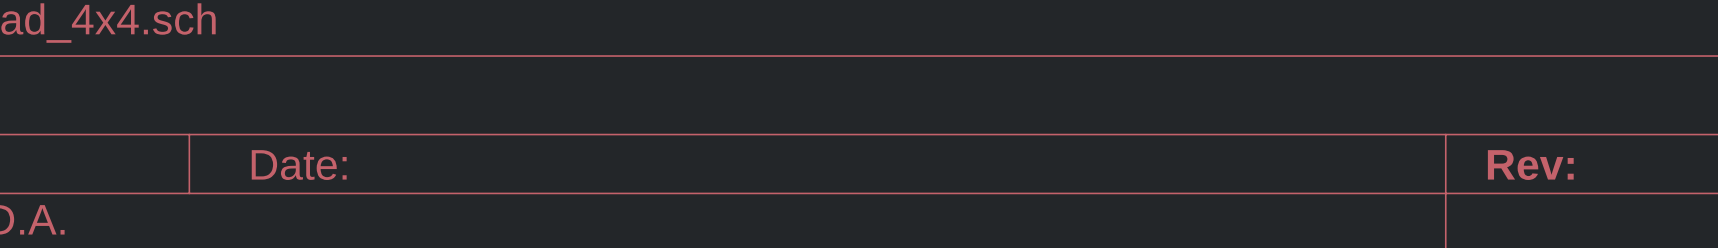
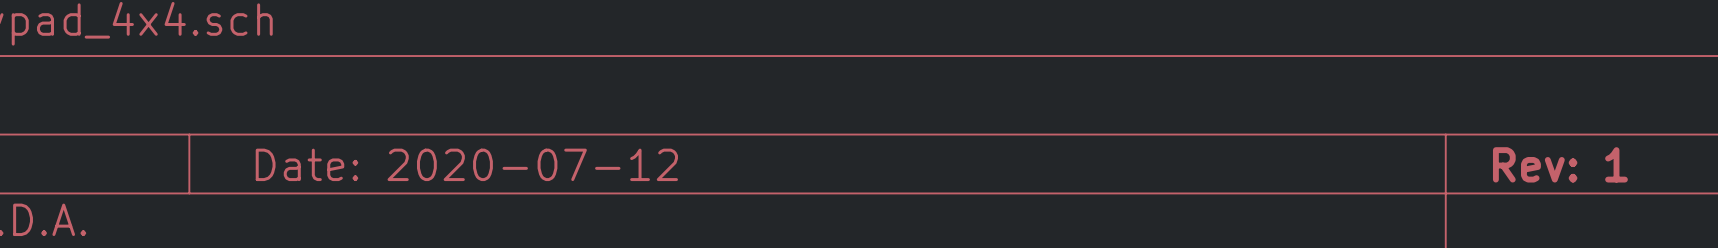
title block: Date: (299, 165) -> Date: 2020-07-12 (466, 164)
title block: Rev: (1530, 165) -> Rev: 1 (1560, 164)

